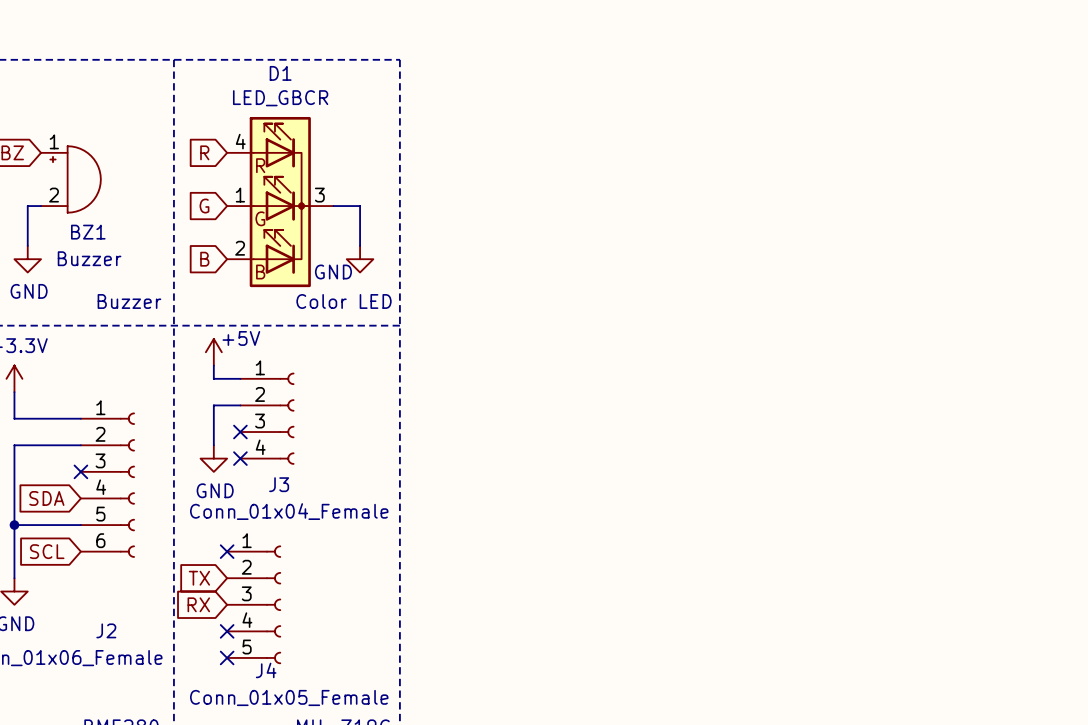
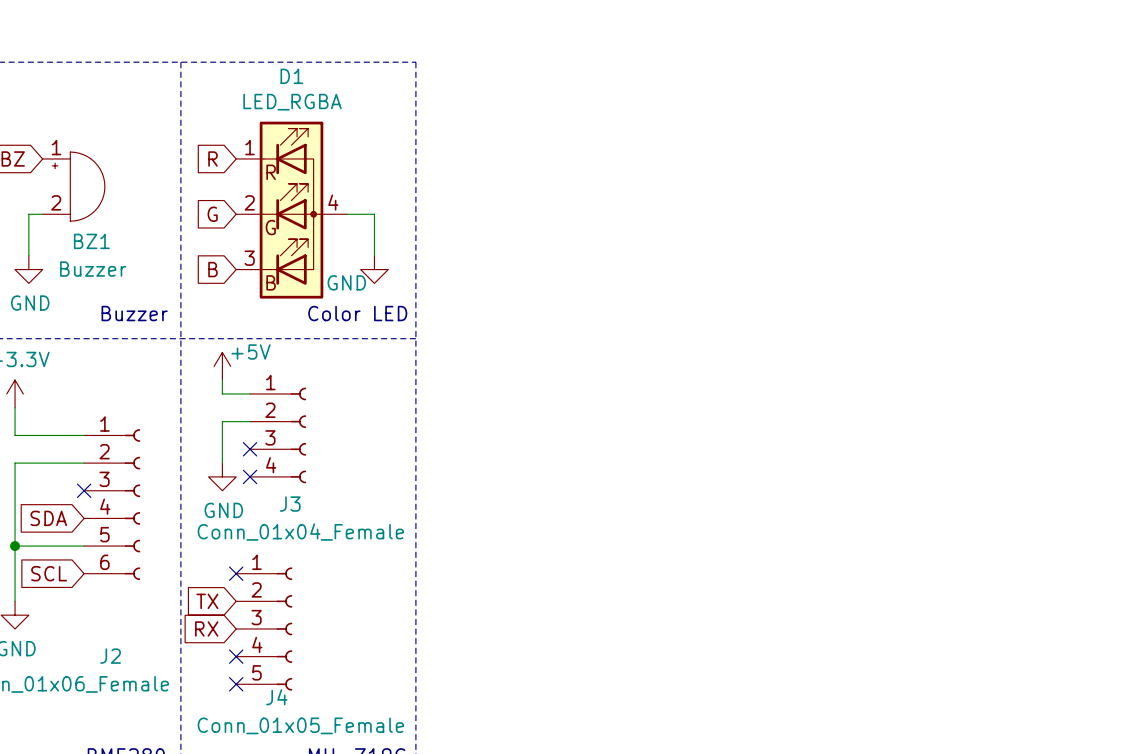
D1 value: LED_GBCR (280, 98) -> LED_RGBA (292, 102)
D1 symbol: [227, 116, 334, 288] -> [236, 121, 347, 299]

